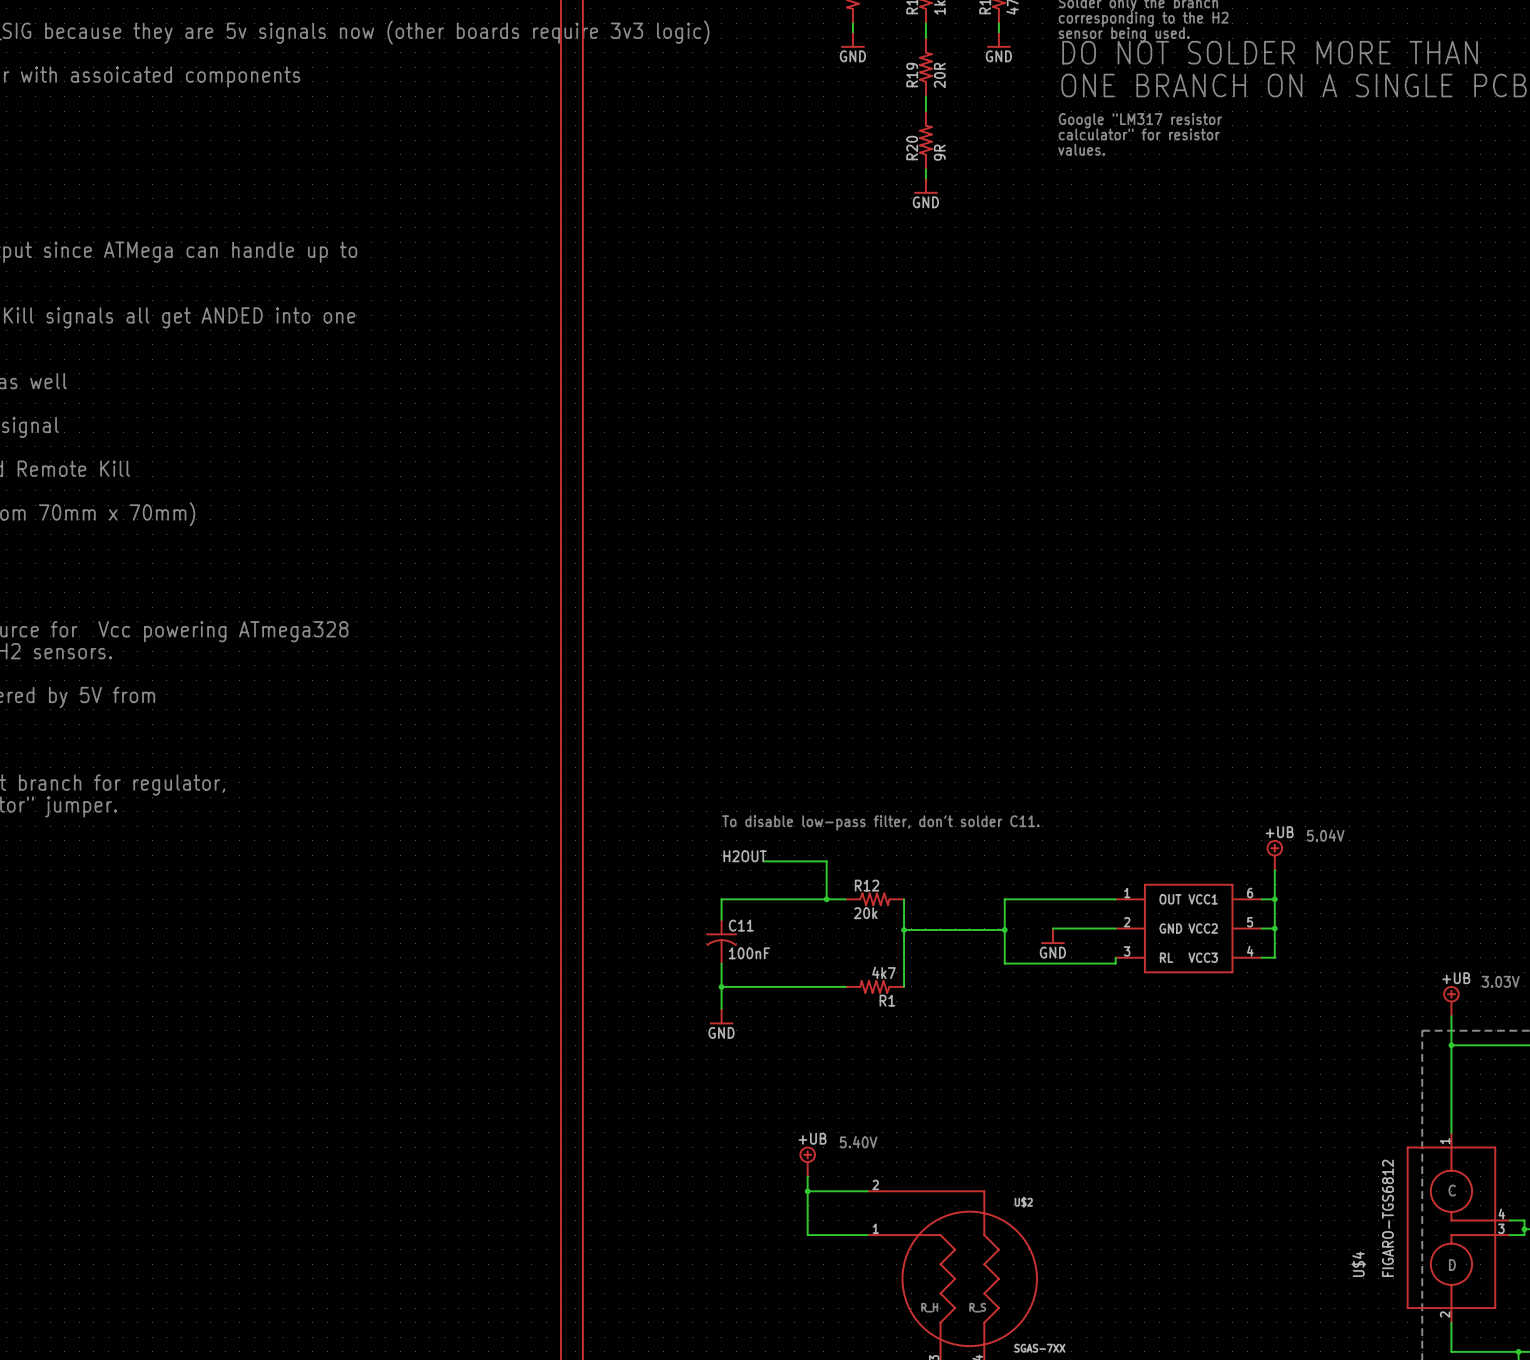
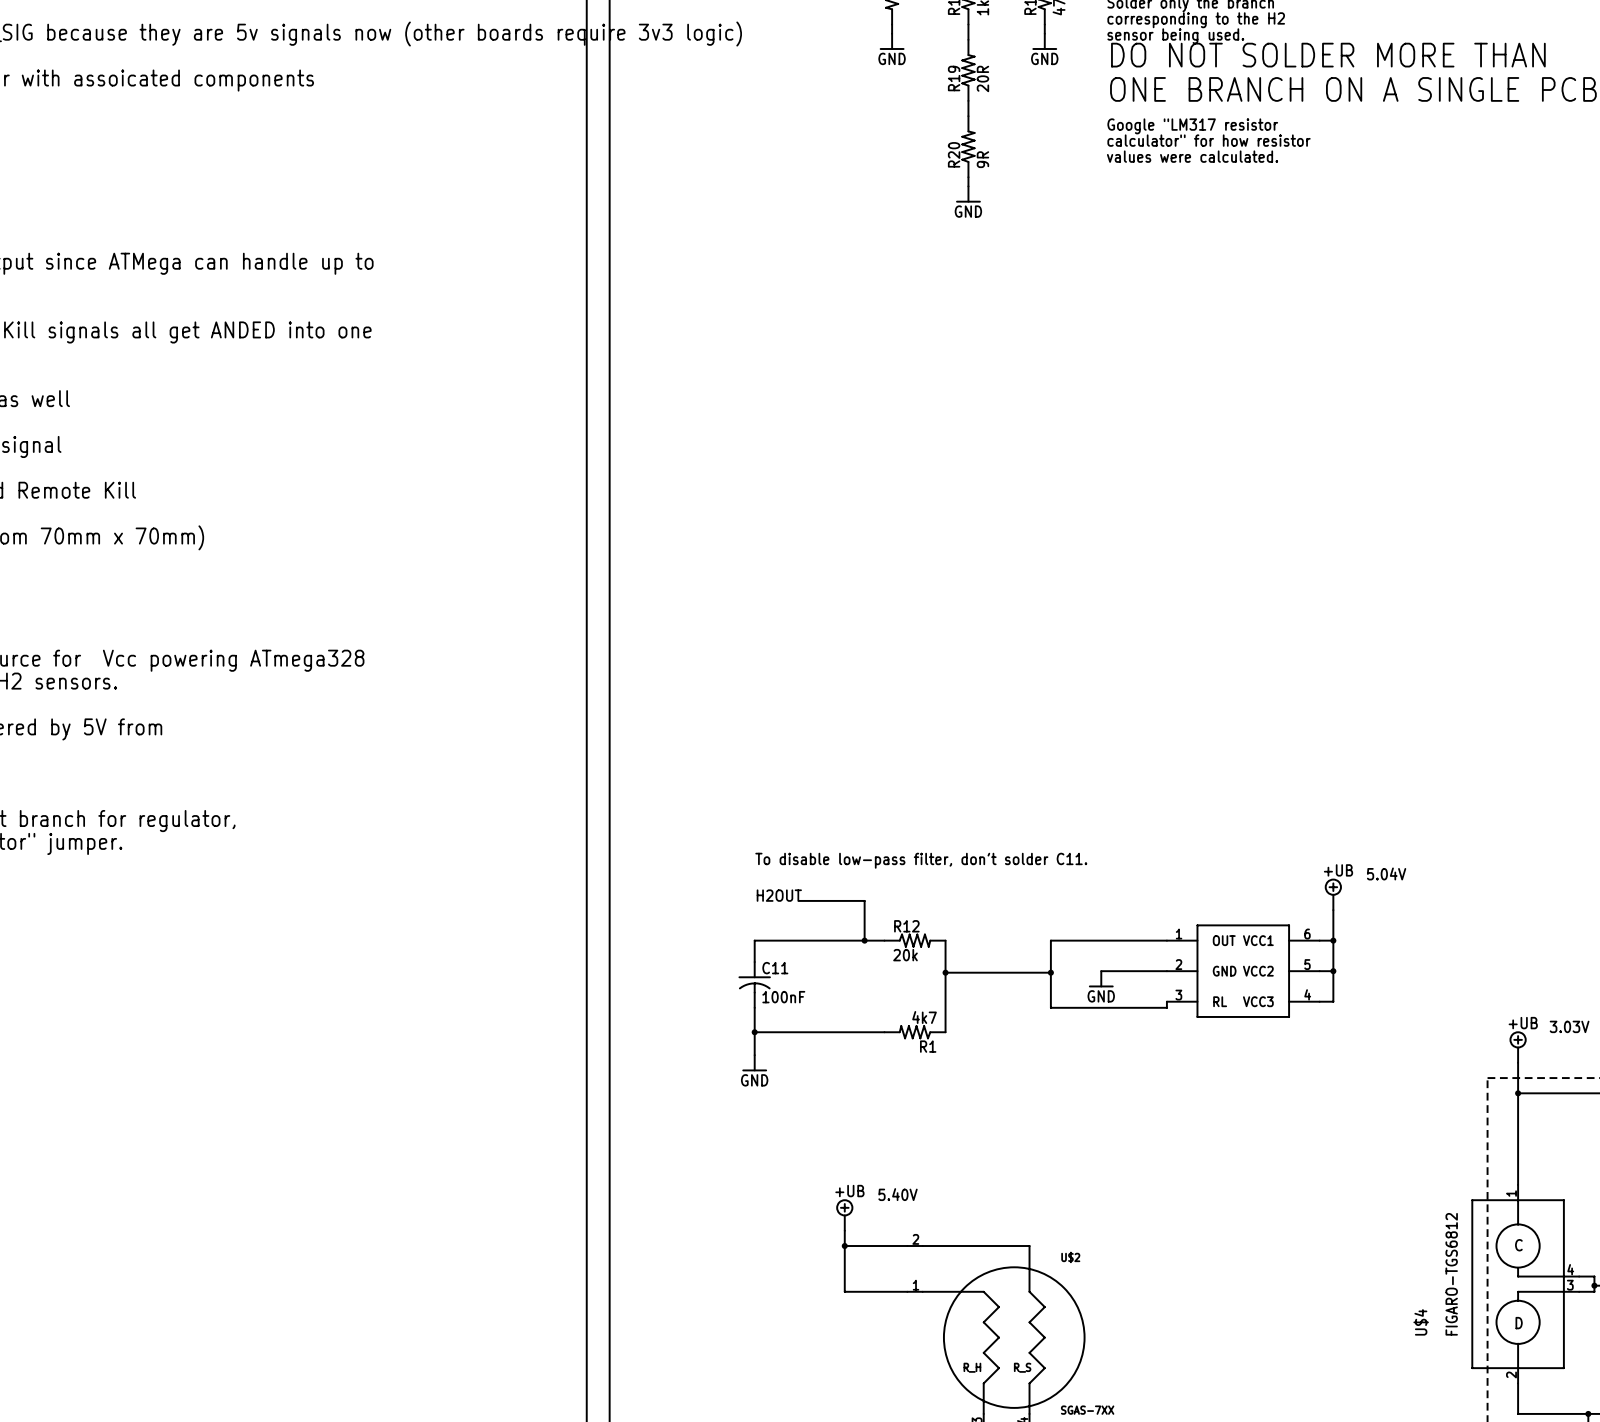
text: calculator" for resistor (1139, 134) -> calculator" for how resistor (1209, 140)
text: values. (1081, 149) -> values were calculated. (1192, 156)

